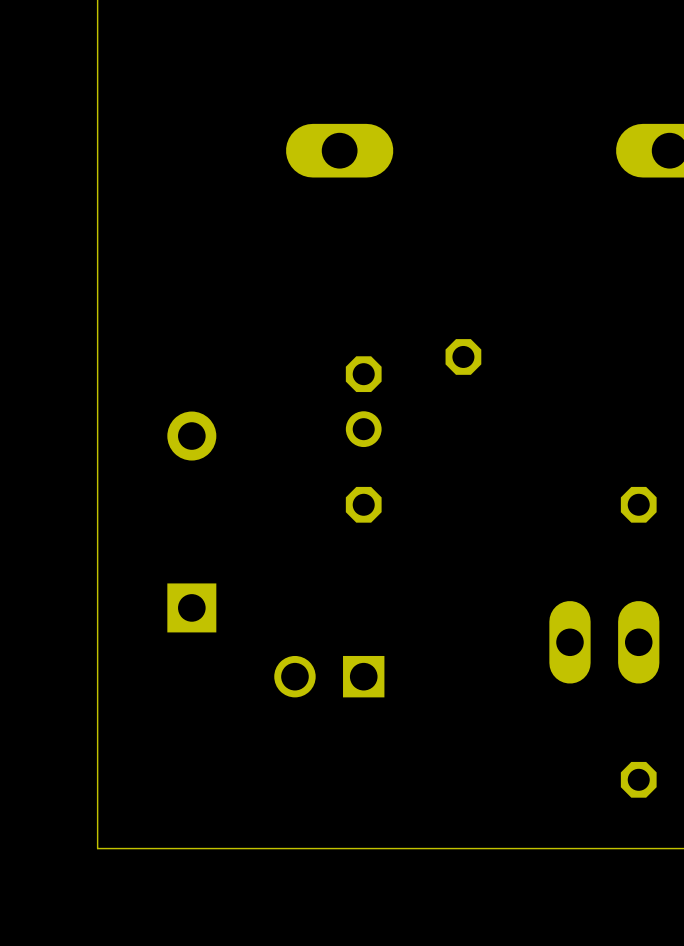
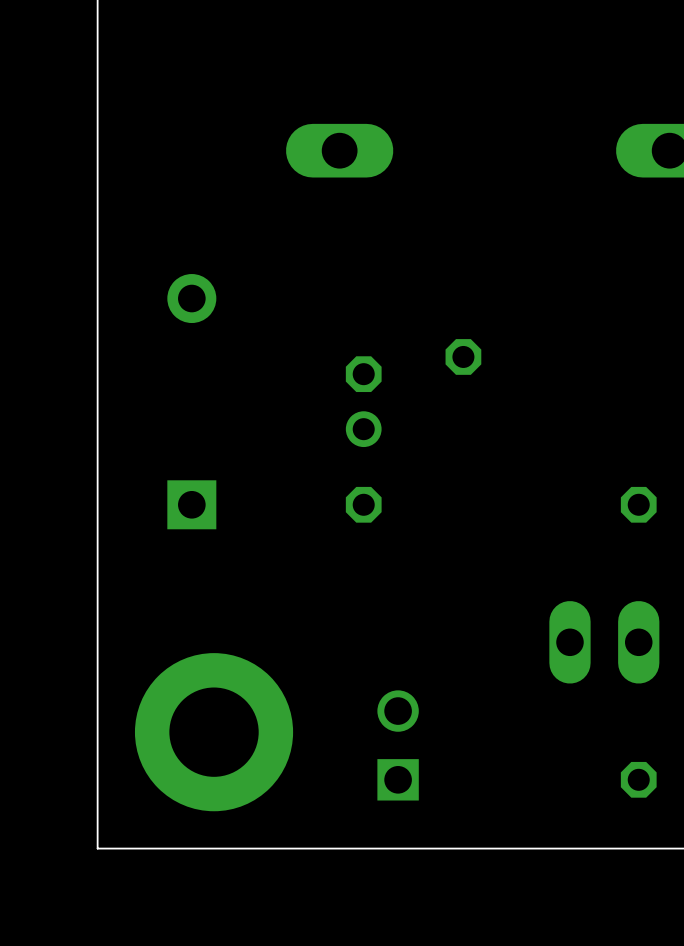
part position: (191, 436) -> (191, 298)
part position: (191, 607) -> (191, 504)
part rotation: 0° (329, 676) -> 90° clockwise (398, 745)
part position: (329, 676) -> (398, 745)
part: none -> (214, 732)

